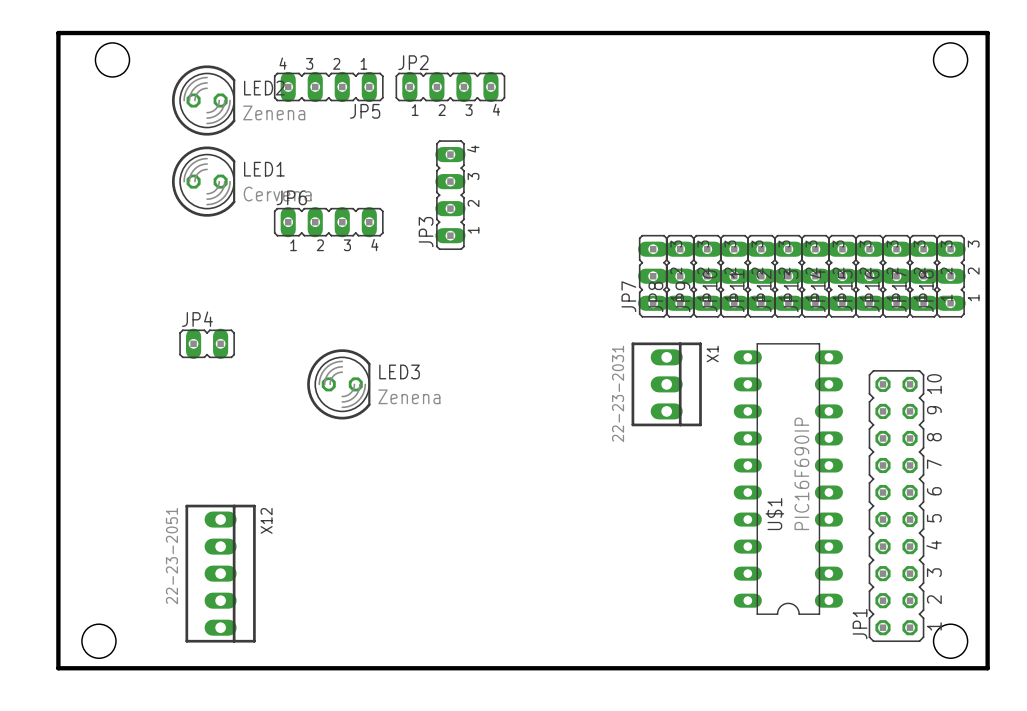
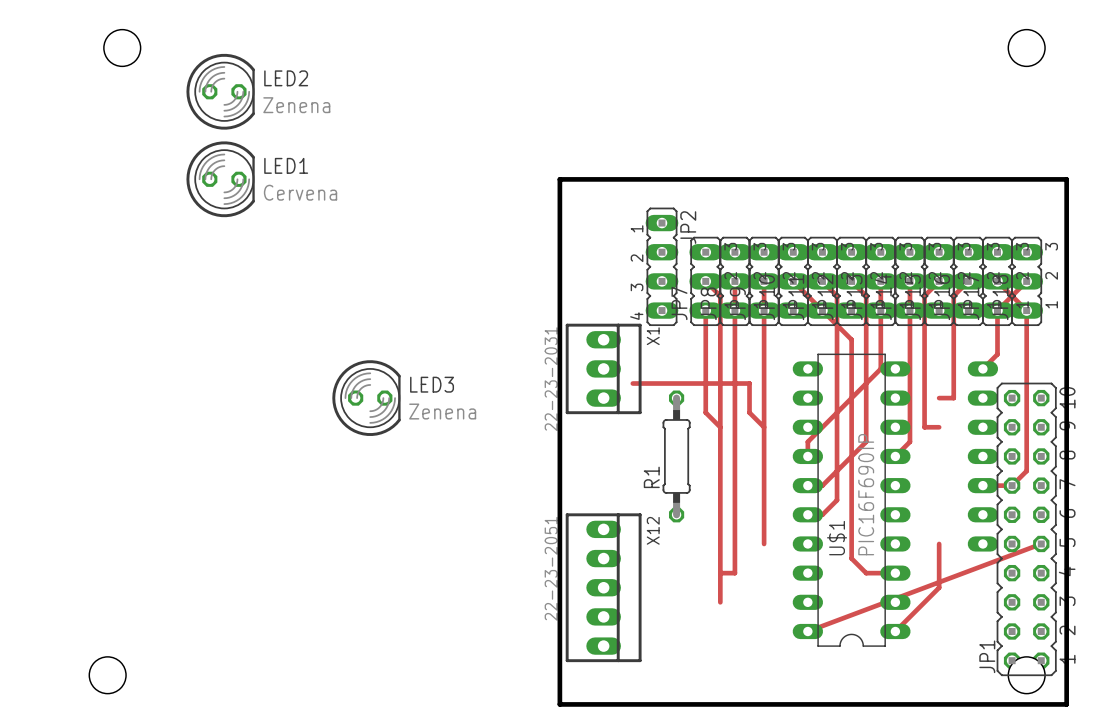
JP2 name position: JP2 (413, 62) -> JP2 (688, 227)
JP2 footprint: [395, 71, 506, 103] -> [645, 207, 679, 327]
JP5: (328, 86) -> none
board edge: (987, 181) (987, 33) (58, 33) (58, 668) (518, 668) -> (1066, 179) (559, 179) (559, 704)
JP3: (450, 195) -> none
JP6: (328, 222) -> none
track: none -> (705, 281) (720, 295) (720, 602)
track: none -> (734, 281) (734, 573) (720, 573)
track: none -> (764, 281) (764, 543)
track: none -> (793, 281) (851, 339) (851, 558) (866, 573) (895, 573)
track: none -> (822, 281) (837, 295) (837, 500) (822, 514) (807, 514)
track: none -> (851, 281) (866, 295) (866, 441) (822, 485) (807, 485)
track: none -> (880, 281) (880, 368) (807, 441) (807, 456)
track: none -> (909, 281) (909, 441) (895, 456)
track: none -> (939, 281) (924, 295) (924, 427) (939, 427)
track: none -> (968, 281) (953, 295) (953, 398) (939, 398)
track: none -> (997, 281) (1026, 310) (1026, 471) (1012, 485) (982, 485)
track: none -> (1026, 281) (997, 310) (997, 354) (982, 368)
track: none -> (705, 310) (705, 412) (720, 427)
JP4: (207, 343) -> none
track: none -> (632, 383) (749, 383) (749, 412) (764, 427)
X1 position: (666, 384) -> (603, 368)
R1: none -> (676, 456)
part: none -> (982, 456)
JP1 position: (896, 506) -> (1026, 529)
track: none -> (939, 543) (939, 587) (895, 631)
track: none -> (1041, 543) (807, 631)
X12 position: (220, 573) -> (603, 587)

